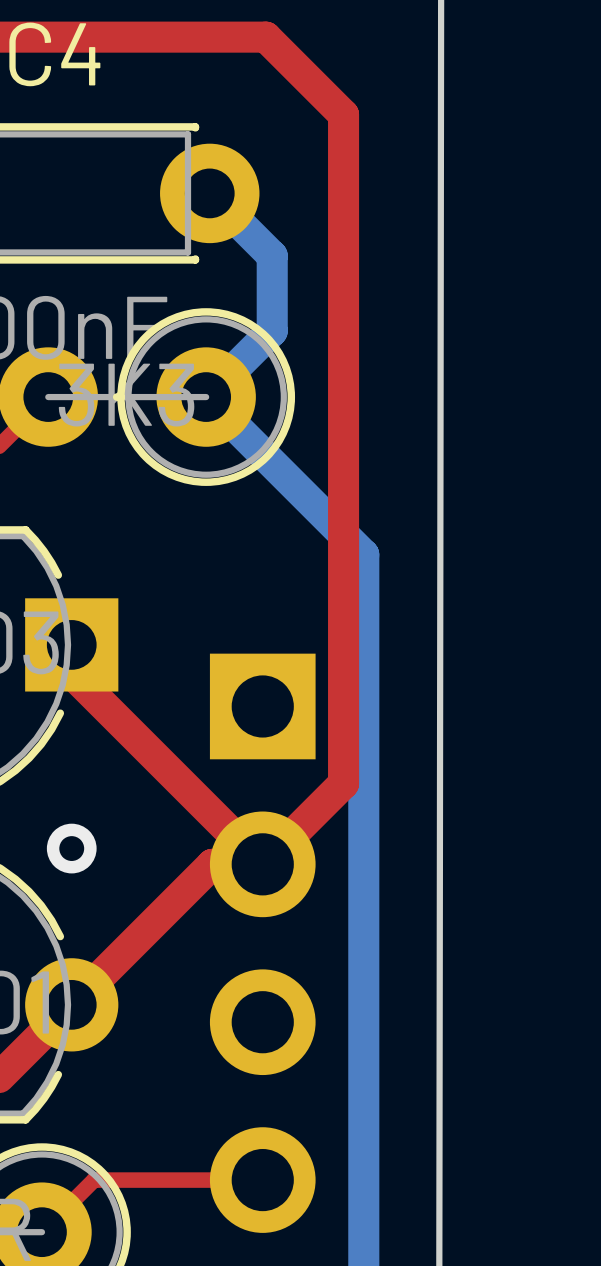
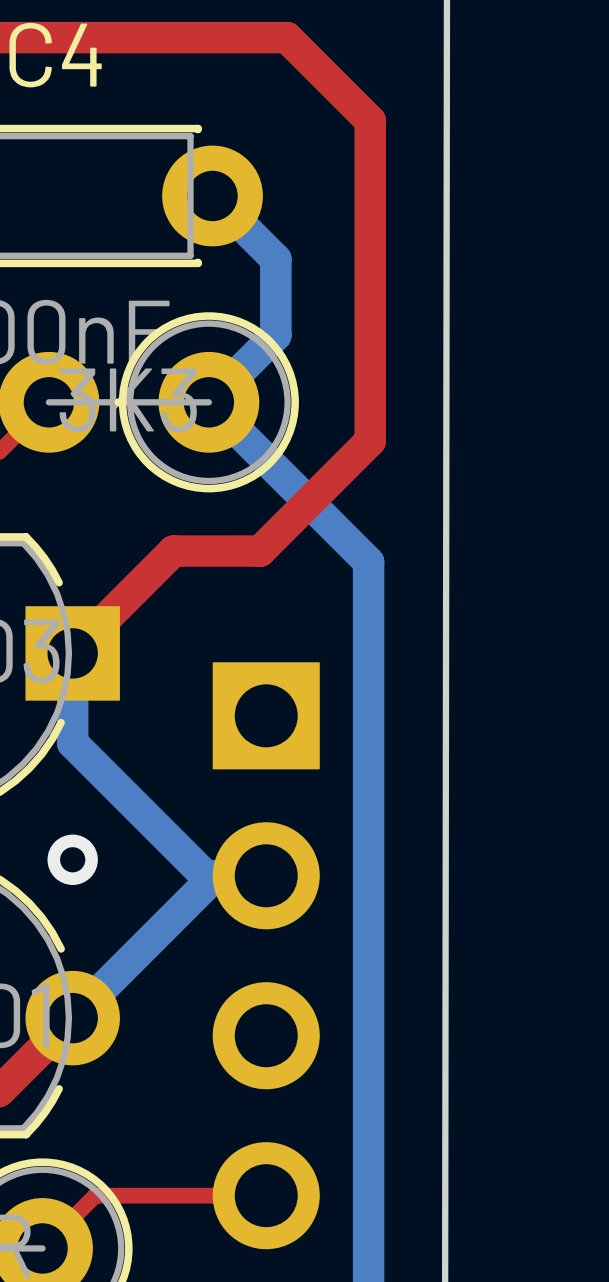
top track: (265, 37) (343, 114) (343, 783) (262, 864) -> (269, 37) (287, 37) (370, 120) (370, 440) (260, 551) (173, 551) (72, 653)
top track: (71, 644) (71, 673) (262, 864) -> none
bottom track: none -> (72, 653) (72, 743) (205, 875) (266, 875)
bottom track: none -> (215, 875) (72, 1018)
top track: (262, 864) (212, 864) (71, 1004) -> none

